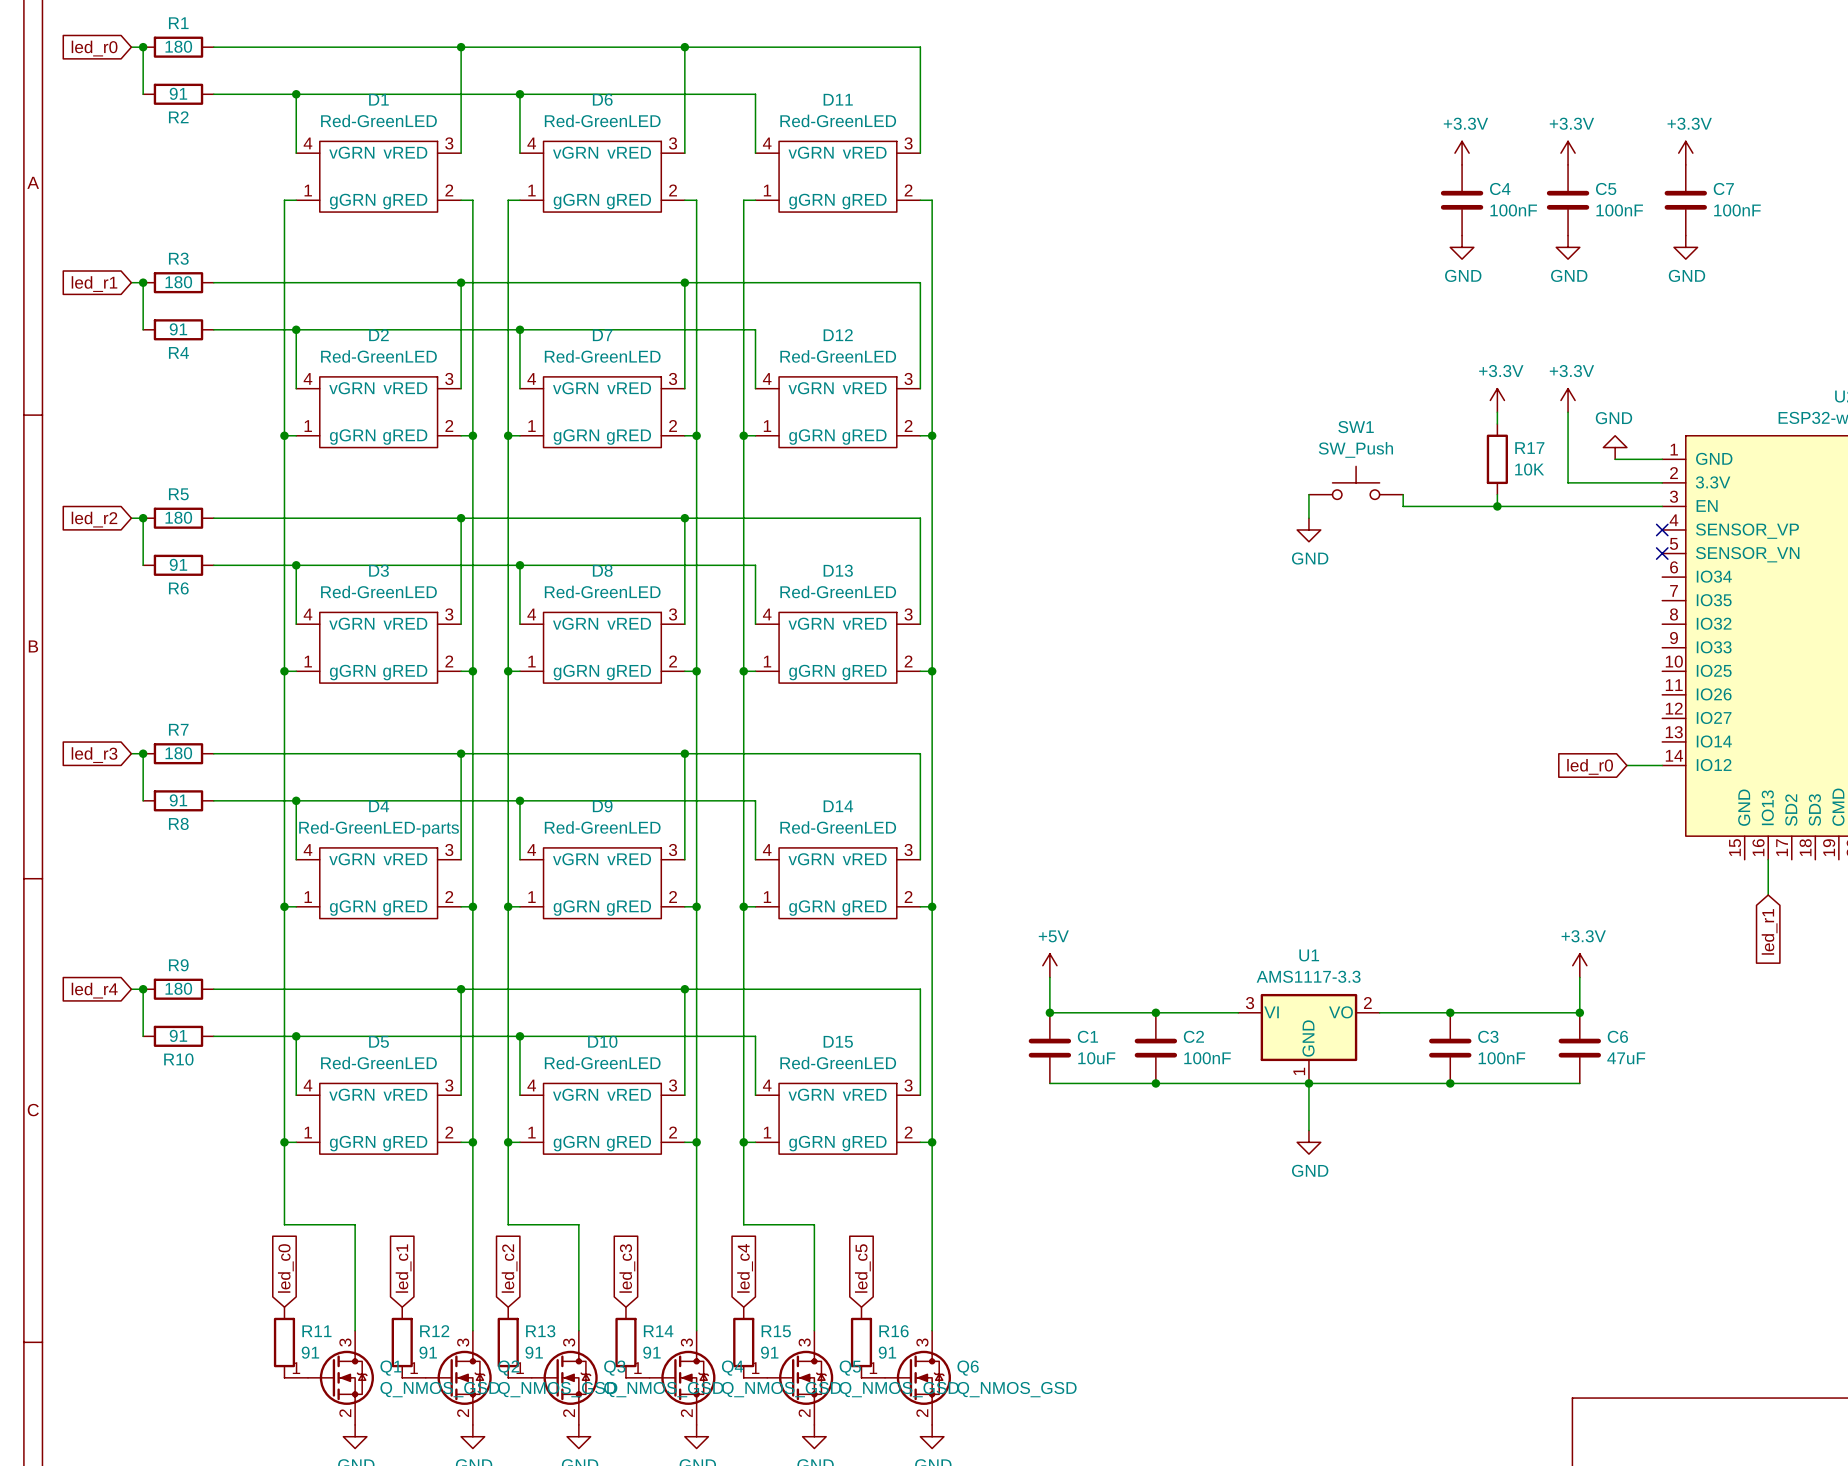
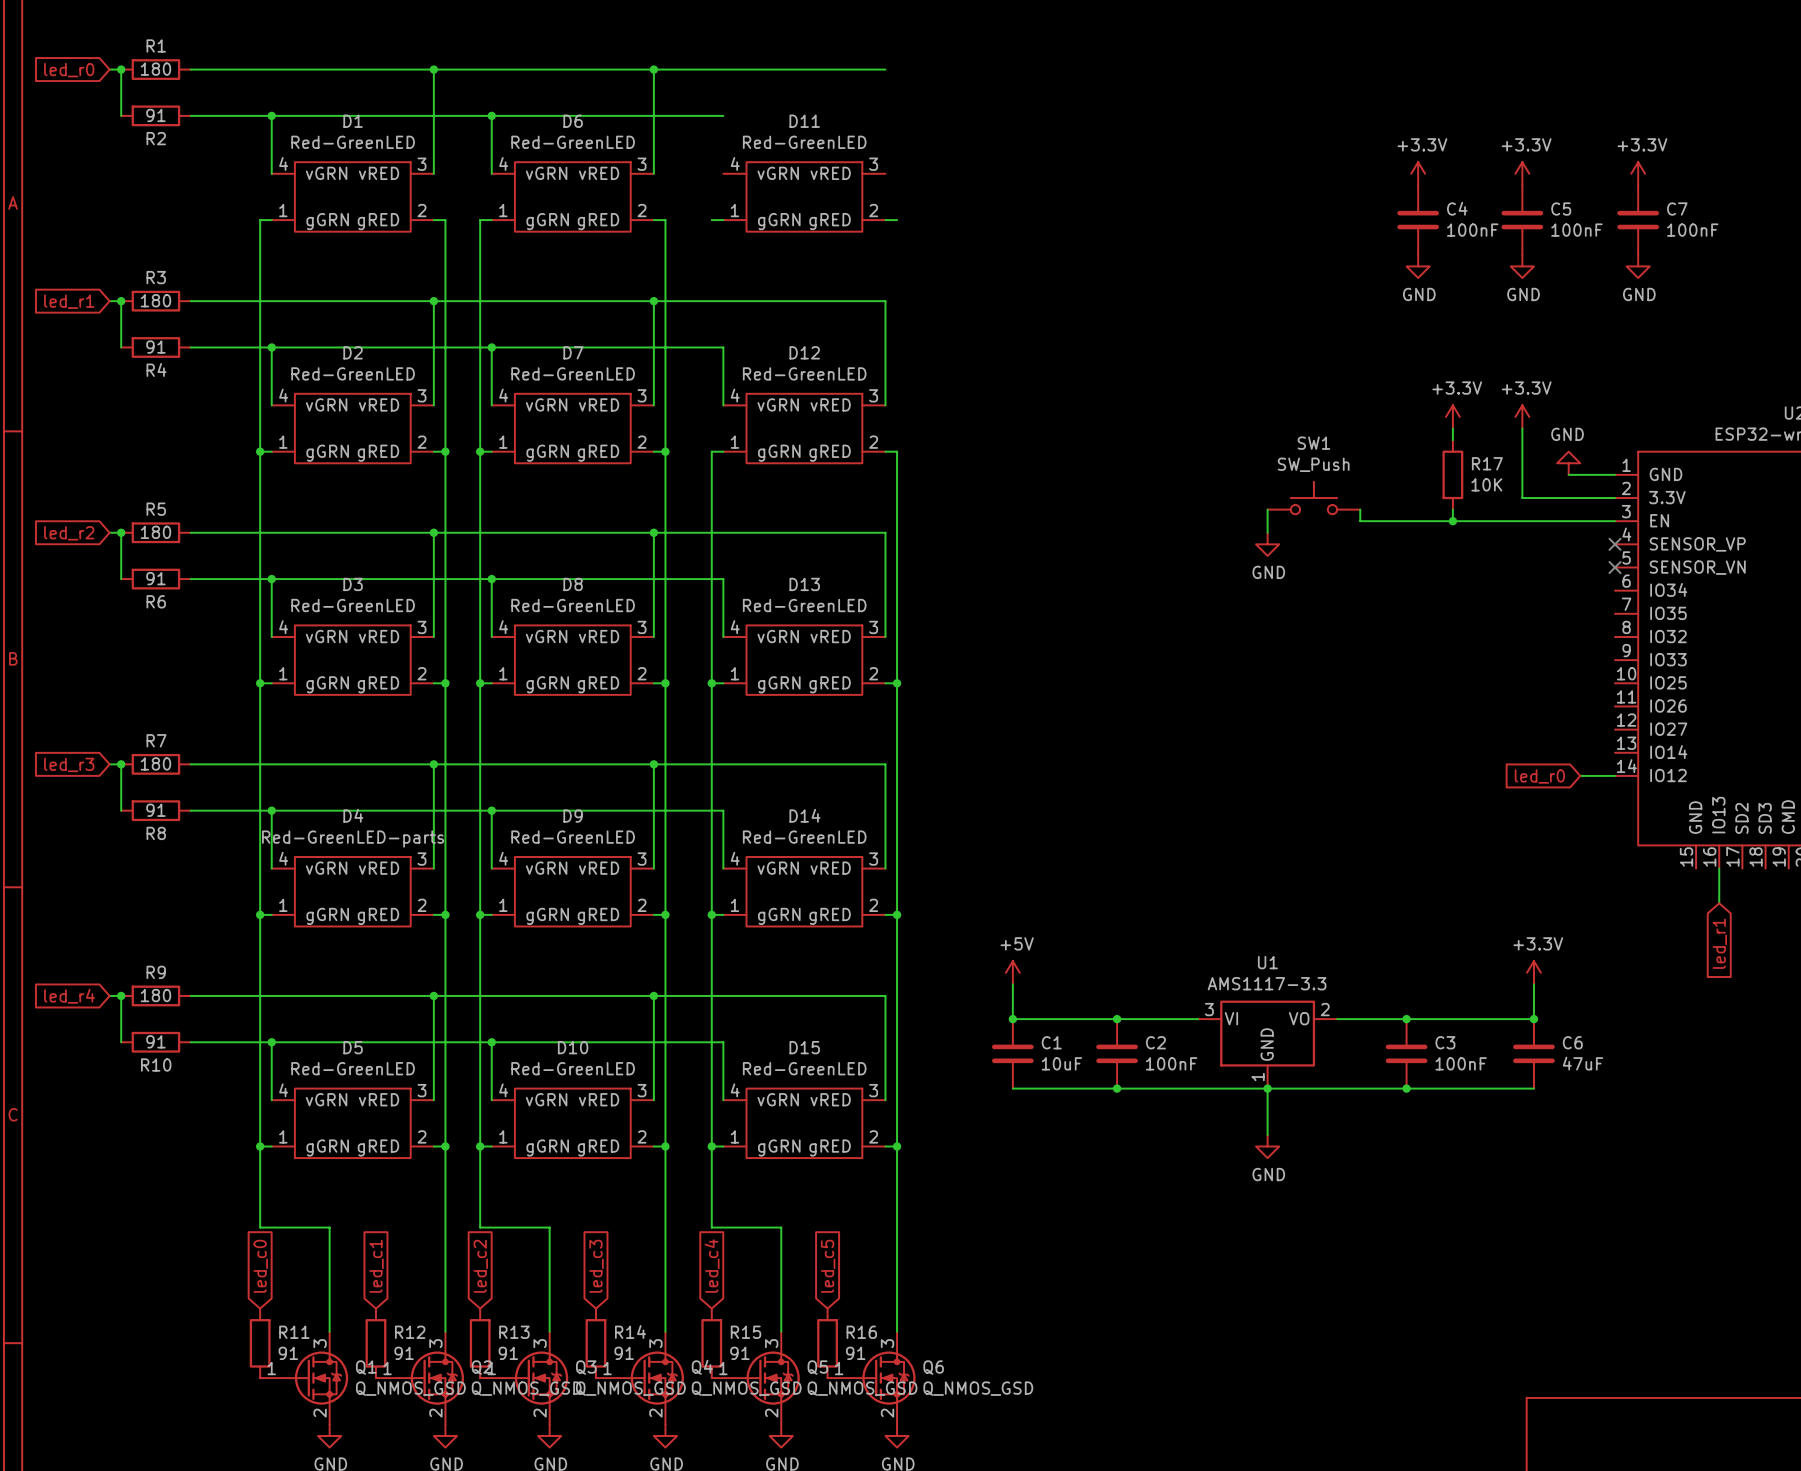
wire: (920, 47) (920, 153) -> none
wire: (755, 94) (755, 153) -> none
wire: (743, 200) (743, 435) -> none
wire: (932, 200) (932, 435) -> none
junction: (743, 435) -> none
junction: (932, 435) -> none

